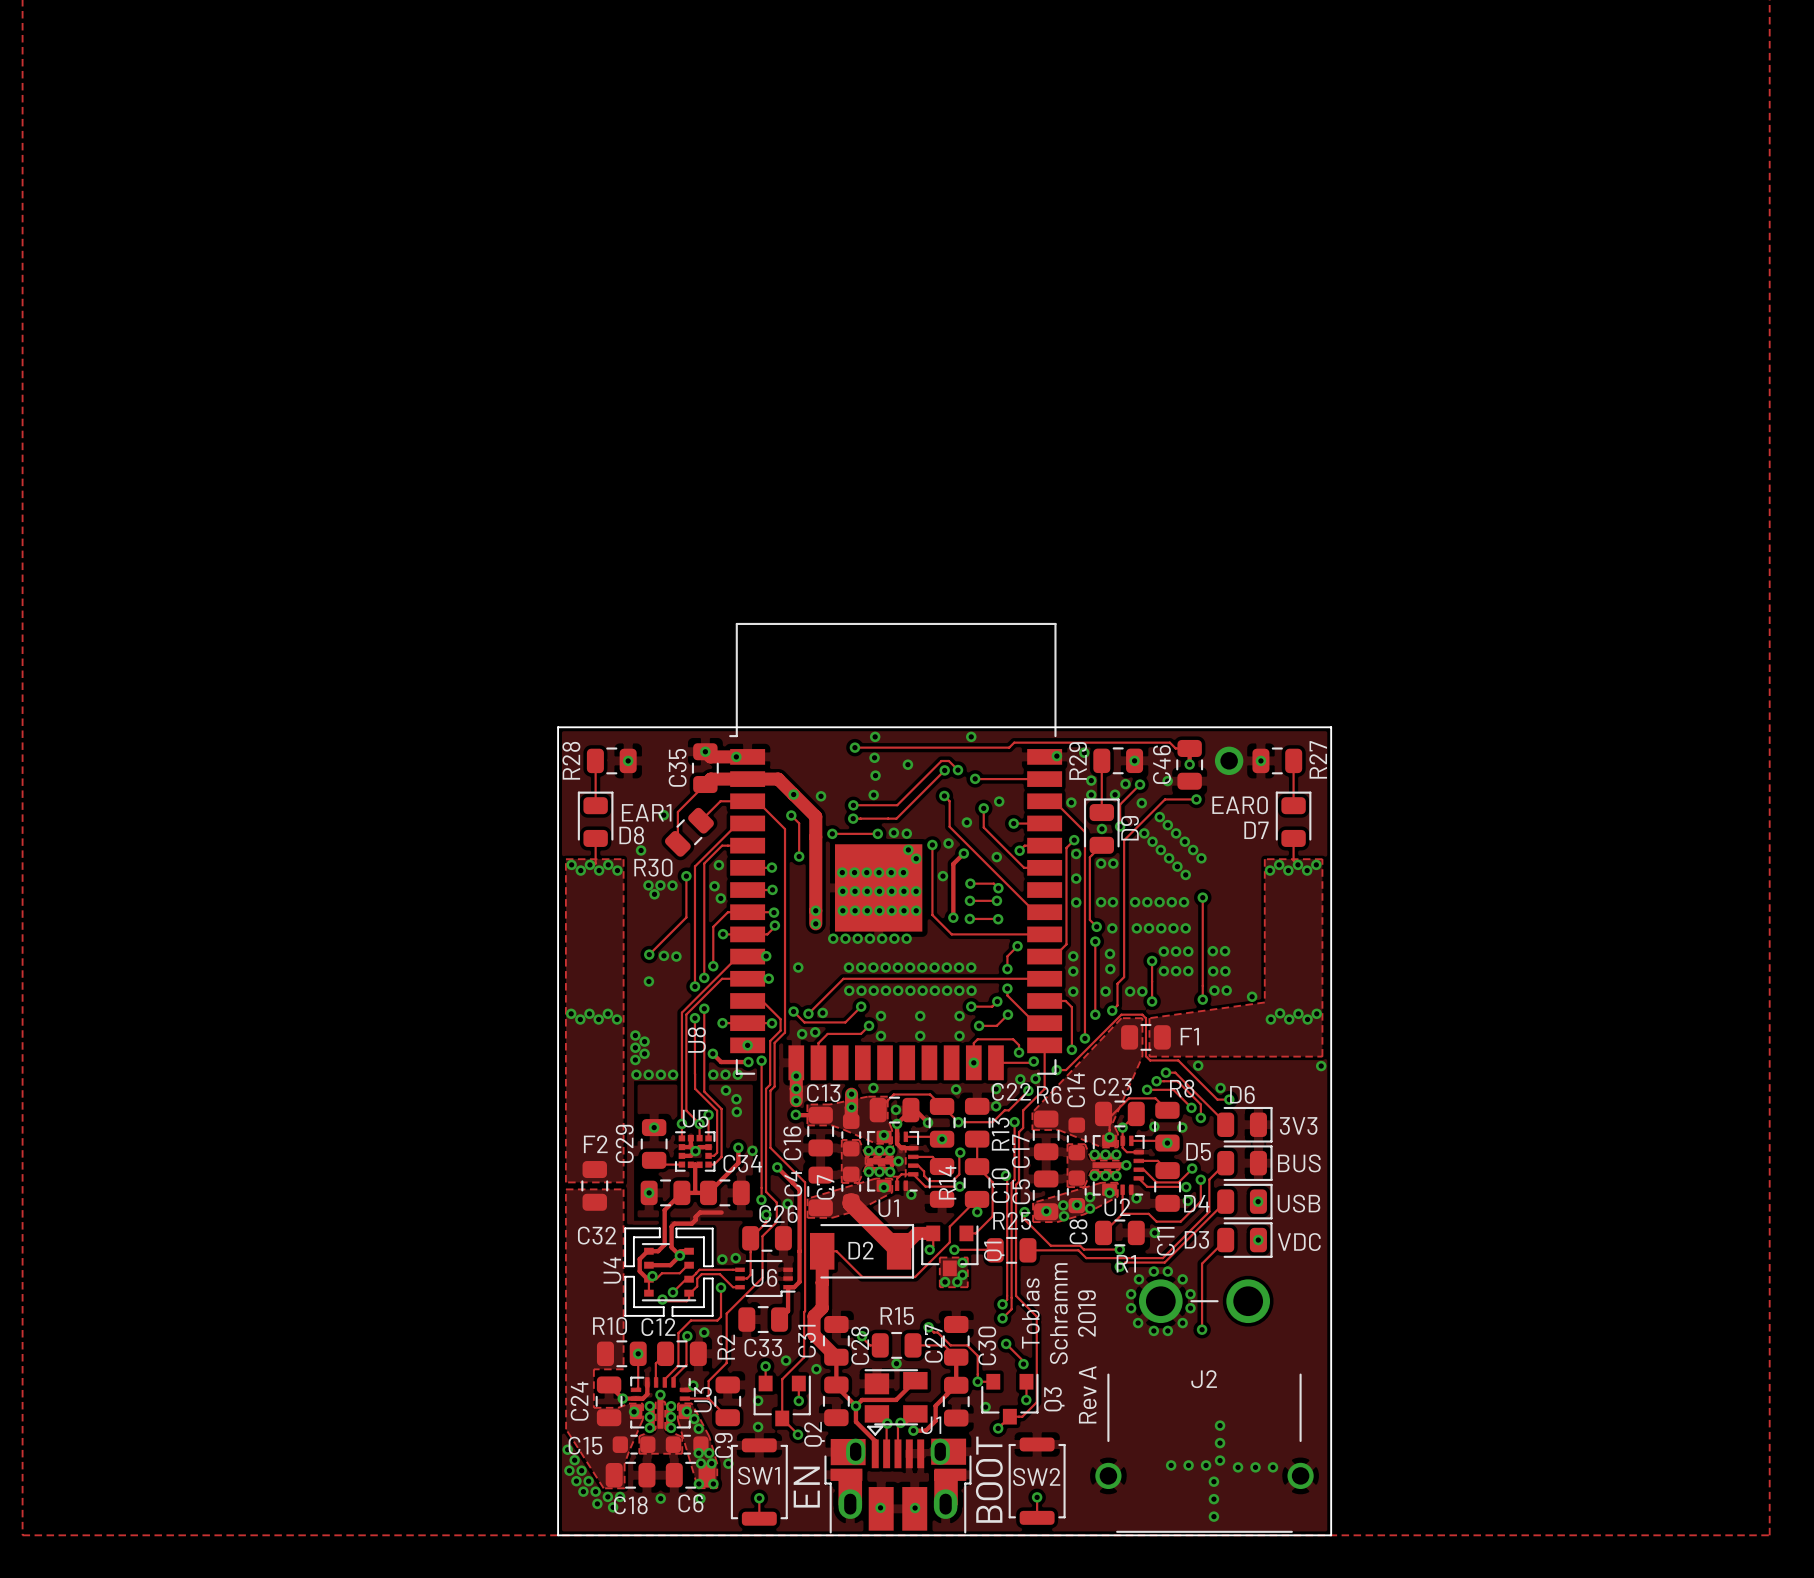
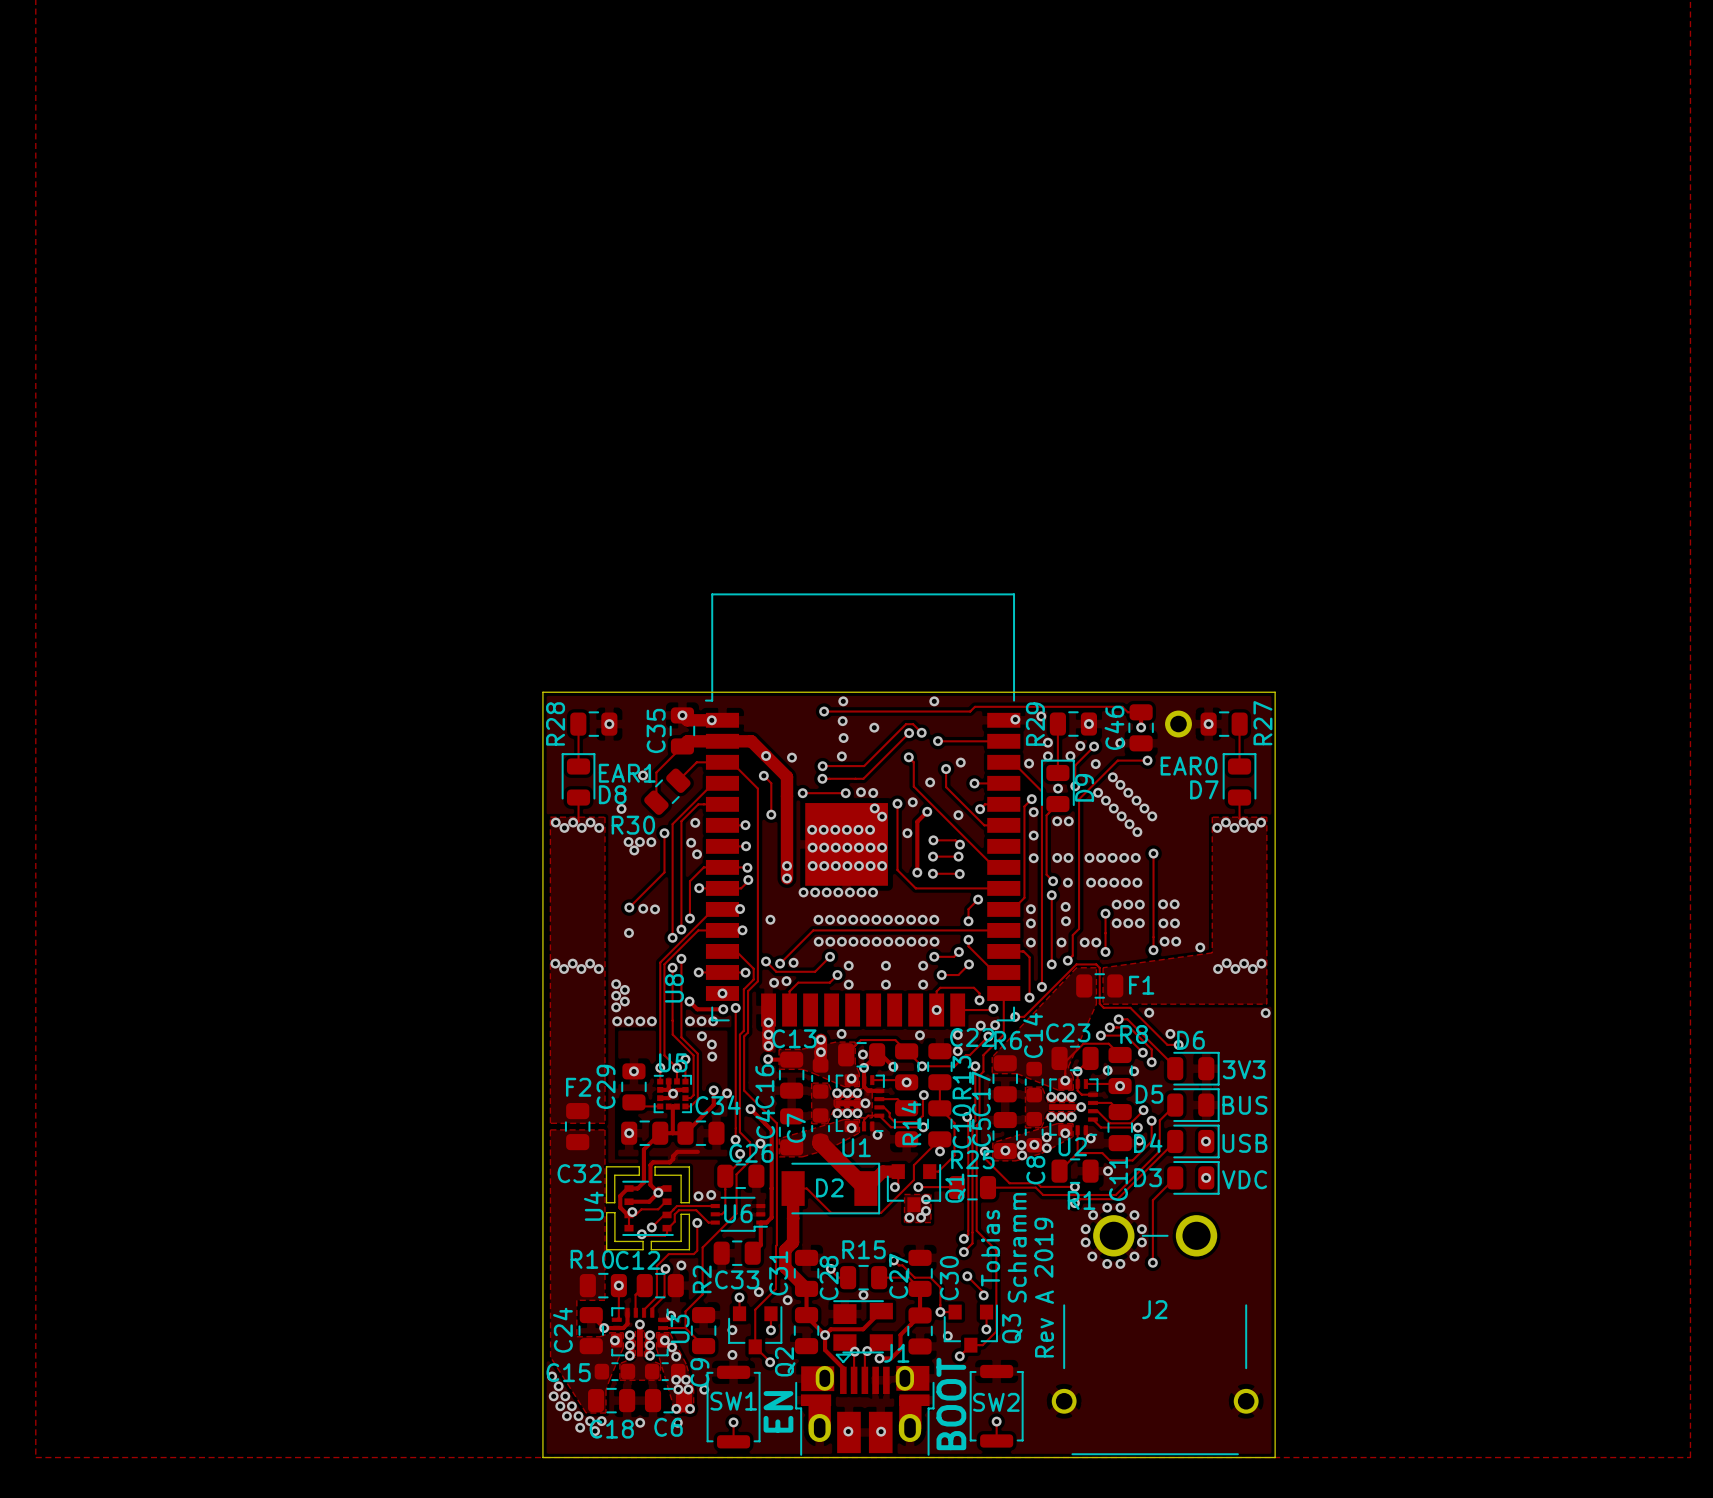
via: (1220, 1425) -> none
via: (1220, 1443) -> none
via: (1220, 1460) -> none
via: (1171, 1465) -> none
via: (1188, 1465) -> none
via: (1206, 1465) -> none
via: (1238, 1467) -> none
via: (1255, 1467) -> none
via: (1272, 1467) -> none
via: (1213, 1481) -> none
via: (1213, 1499) -> none
via: (1213, 1516) -> none

